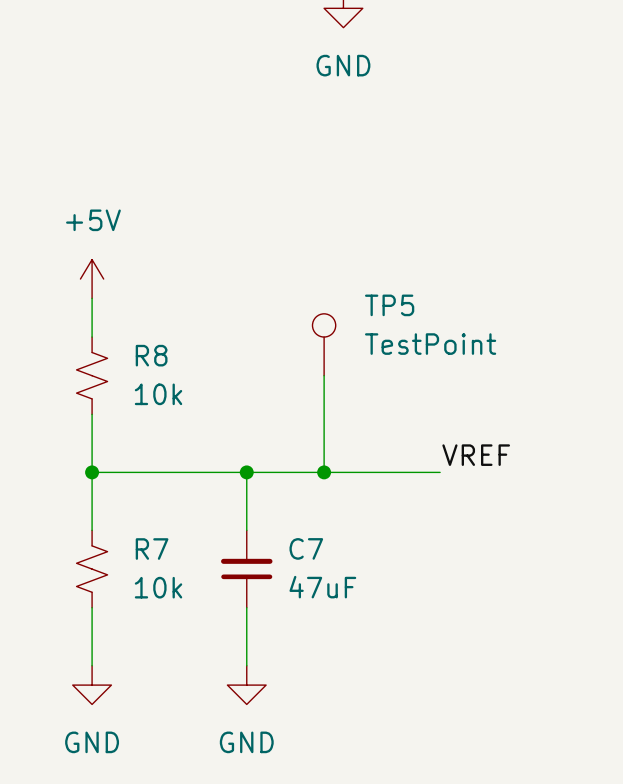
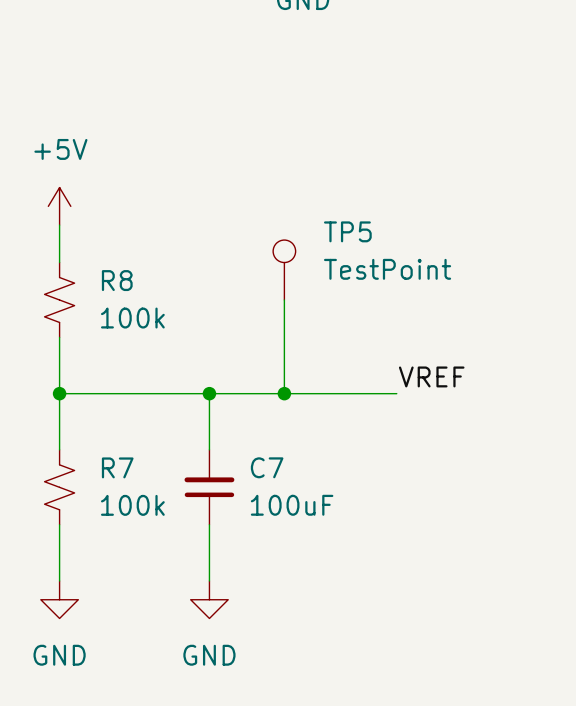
R8 value: 10k (158, 394) -> 100k (132, 318)
R7 value: 10k (158, 587) -> 100k (132, 505)
C7 value: 47uF (322, 587) -> 100uF (292, 505)

